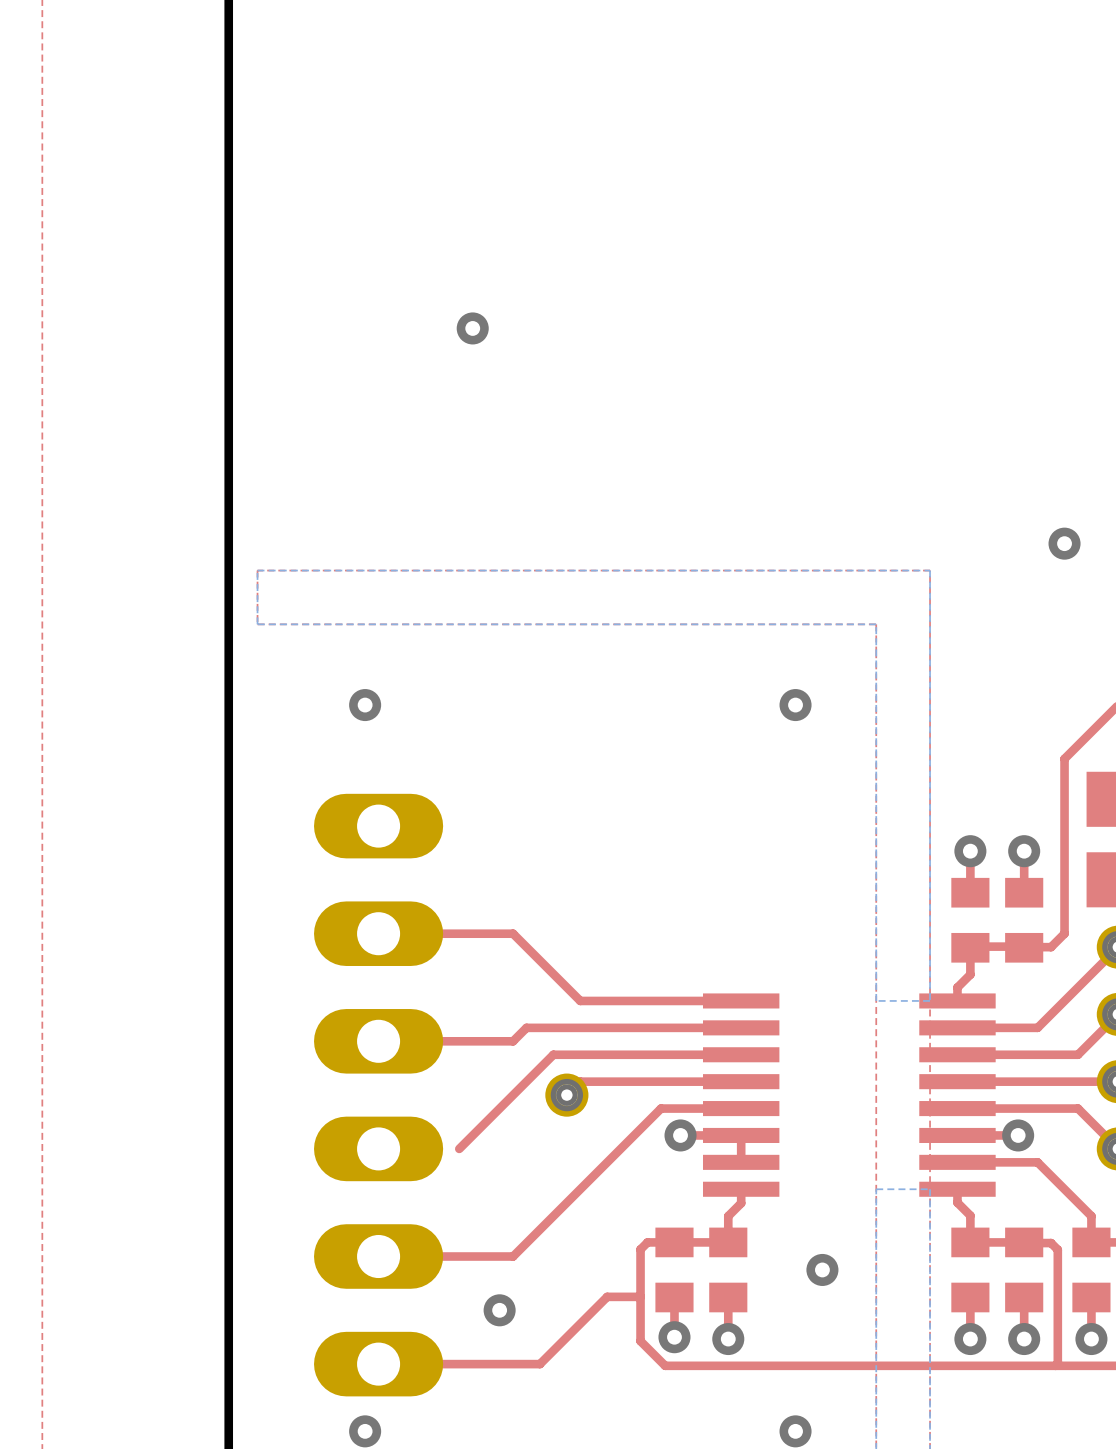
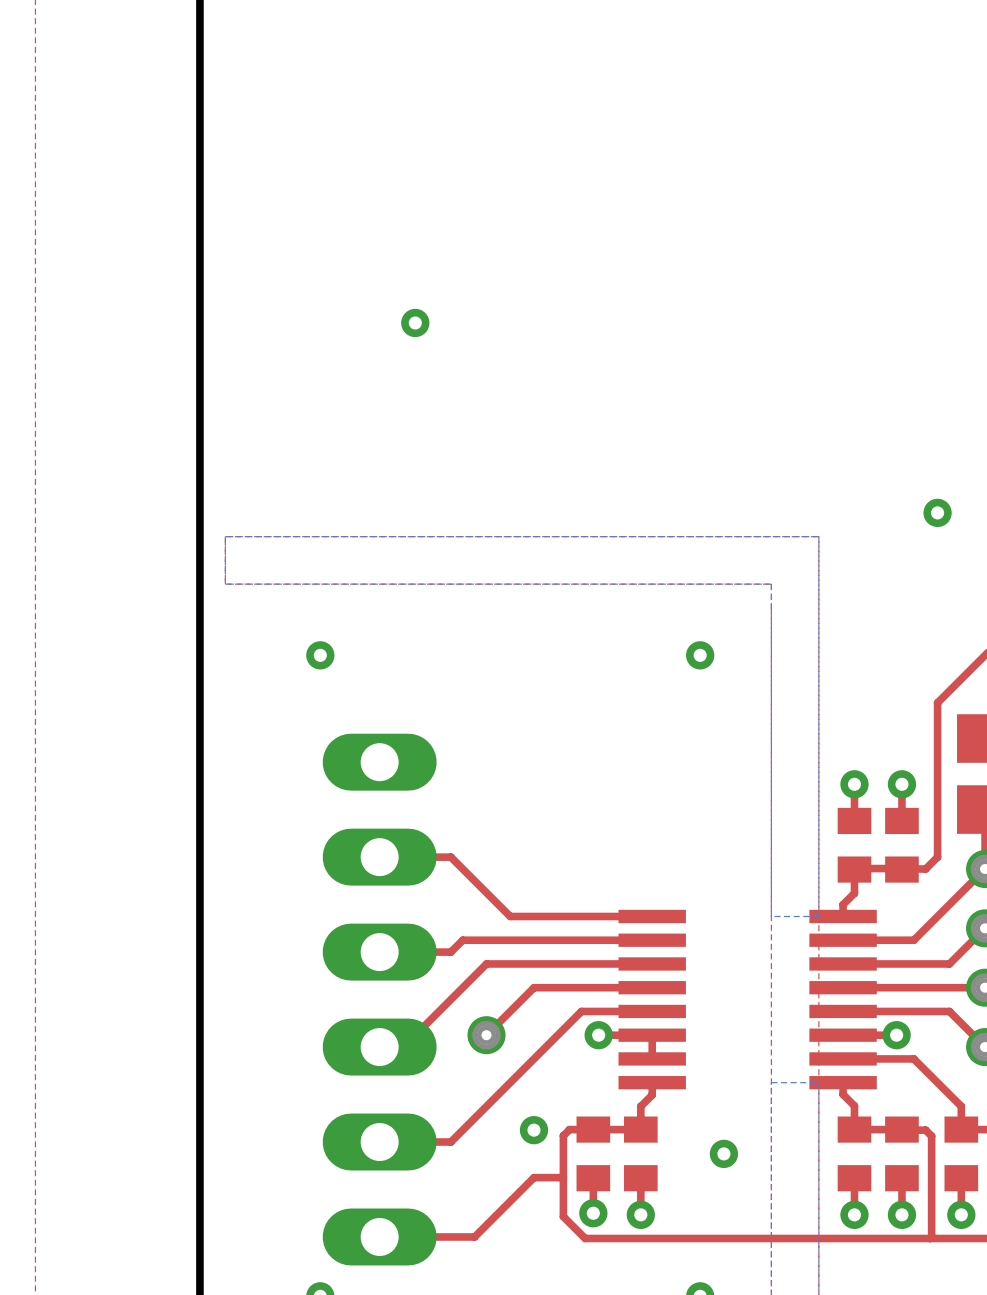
top track: (607, 1081) (580, 1081) (566, 1095) -> (533, 987) (486, 1035)
part position: (378, 1095) -> (379, 999)
part position: (566, 1095) -> (486, 1035)
via position: (499, 1310) -> (533, 1130)

